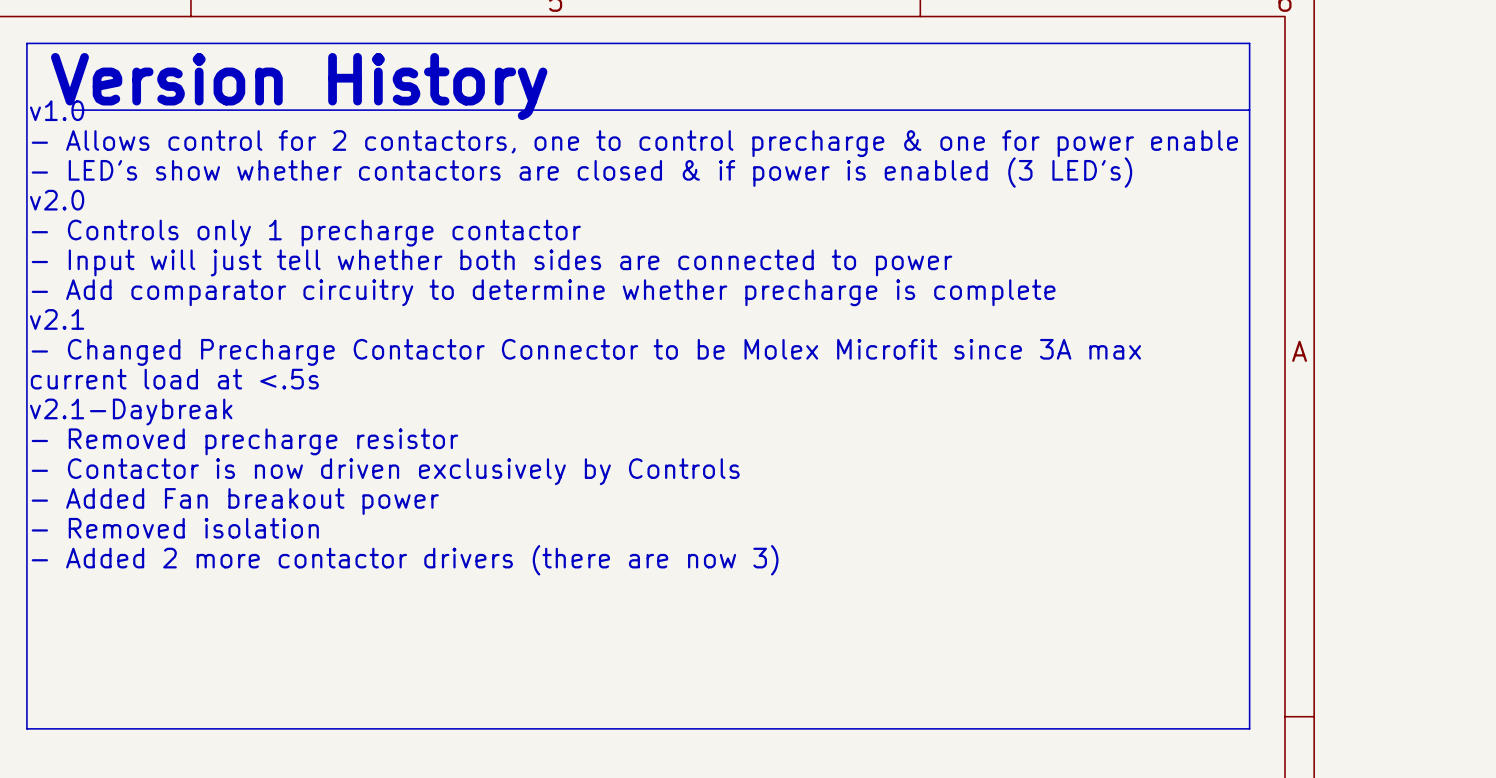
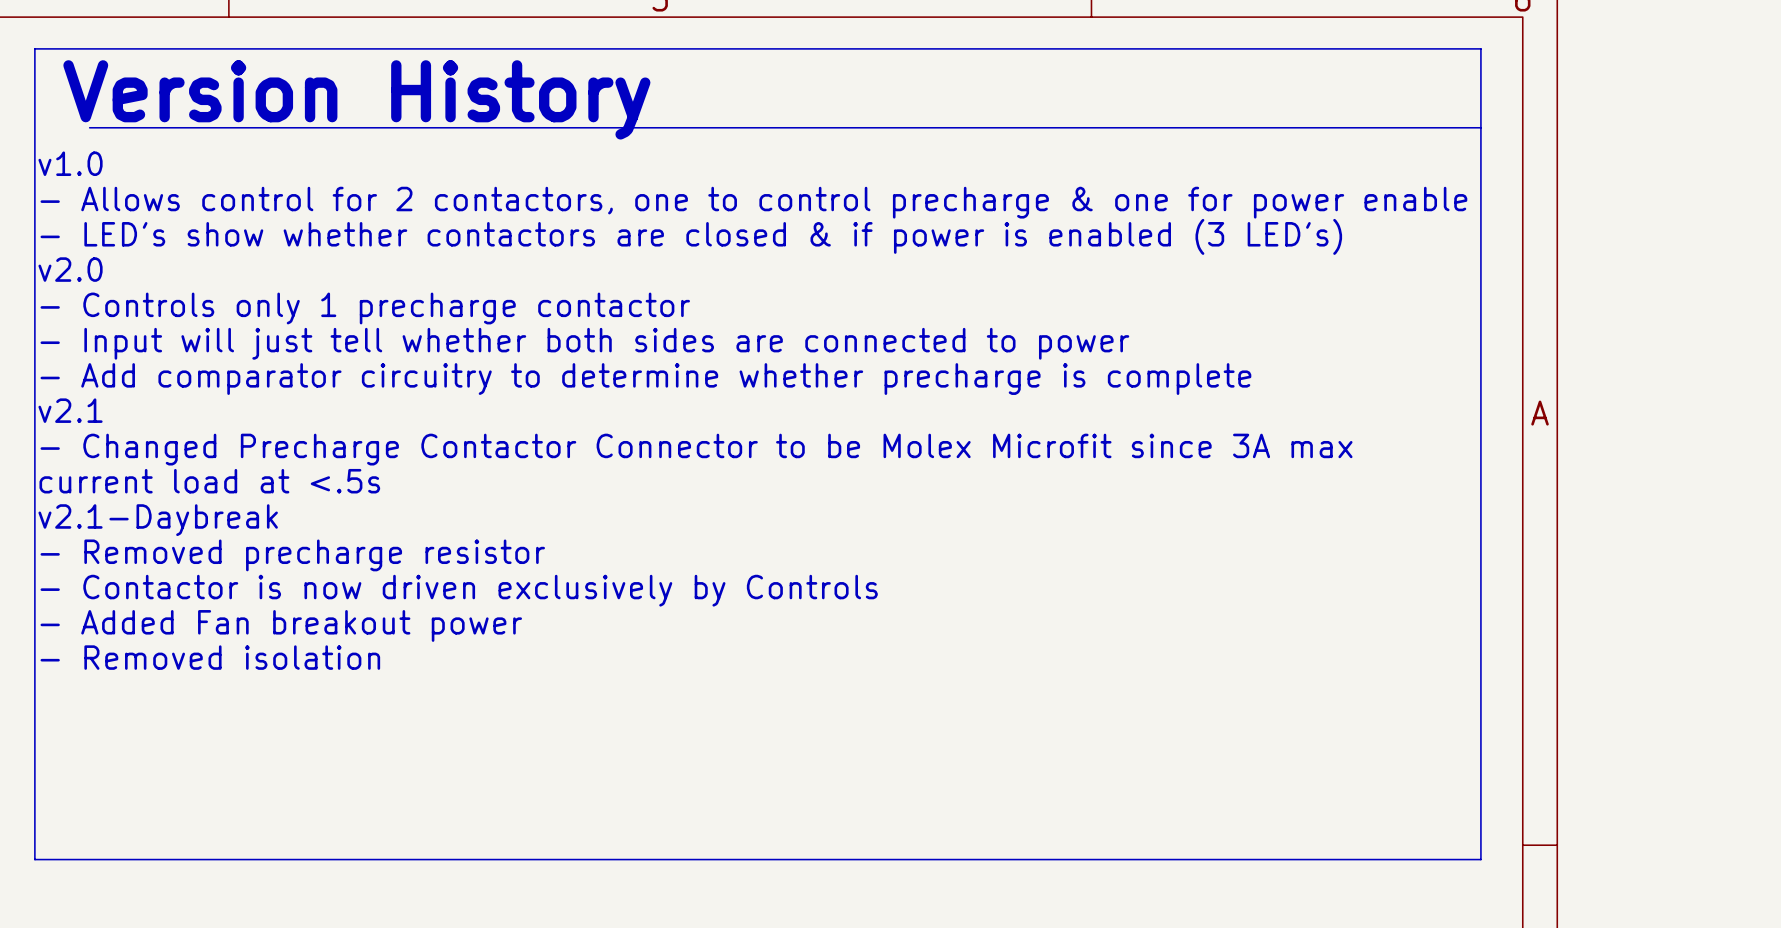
text: v1.0 (57, 110) -> none
text: - Allows control for 2 contactors, one to control precharge & one for power enable (634, 143) -> v1.0 (70, 163)
text: - LED's show whether contactors are closed & if power is enabled (3 LED's) (581, 172) -> - Allows control for 2 contactors, one to control precharge & one for power enable (753, 202)
text: v2.0 (57, 200) -> - LED's show whether contactors are closed & if power is enabled (3 LED's) (691, 236)
text: - Controls only 1 precharge contactor (306, 233) -> v2.0 (70, 269)
text: - Input will just tell whether both sides are connected to power (491, 262) -> - Controls only 1 precharge contactor (365, 308)
text: - Add comparator circuitry to determine whether precharge is complete (543, 292) -> - Input will just tell whether both sides are connected to power (584, 343)
text: v2.1 (57, 319) -> - Add comparator circuitry to determine whether precharge is complete (645, 379)
text: - Changed Precharge Contactor Connector to be Molex Microfit since 3A max (586, 352) -> v2.1 (70, 410)
text: current load at <.5s (174, 379) -> - Changed Precharge Contactor Connector to be Molex Microfit since 3A max (696, 449)
text: v2.1-Daybreak (131, 412) -> current load at <.5s (209, 481)
text: - Removed precharge resistor (244, 441) -> v2.1-Daybreak (158, 520)
text: - Contactor is now driven exclusively by Controls (385, 471) -> - Removed precharge resistor (292, 555)
text: - Added Fan breakout power (235, 501) -> - Contactor is now driven exclusively by Controls (459, 590)
text: - Removed isolation (175, 528) -> - Added Fan breakout power (281, 625)
text: - Added 2 more contactor drivers (there are now 3) (405, 560) -> - Removed isolation (210, 657)

